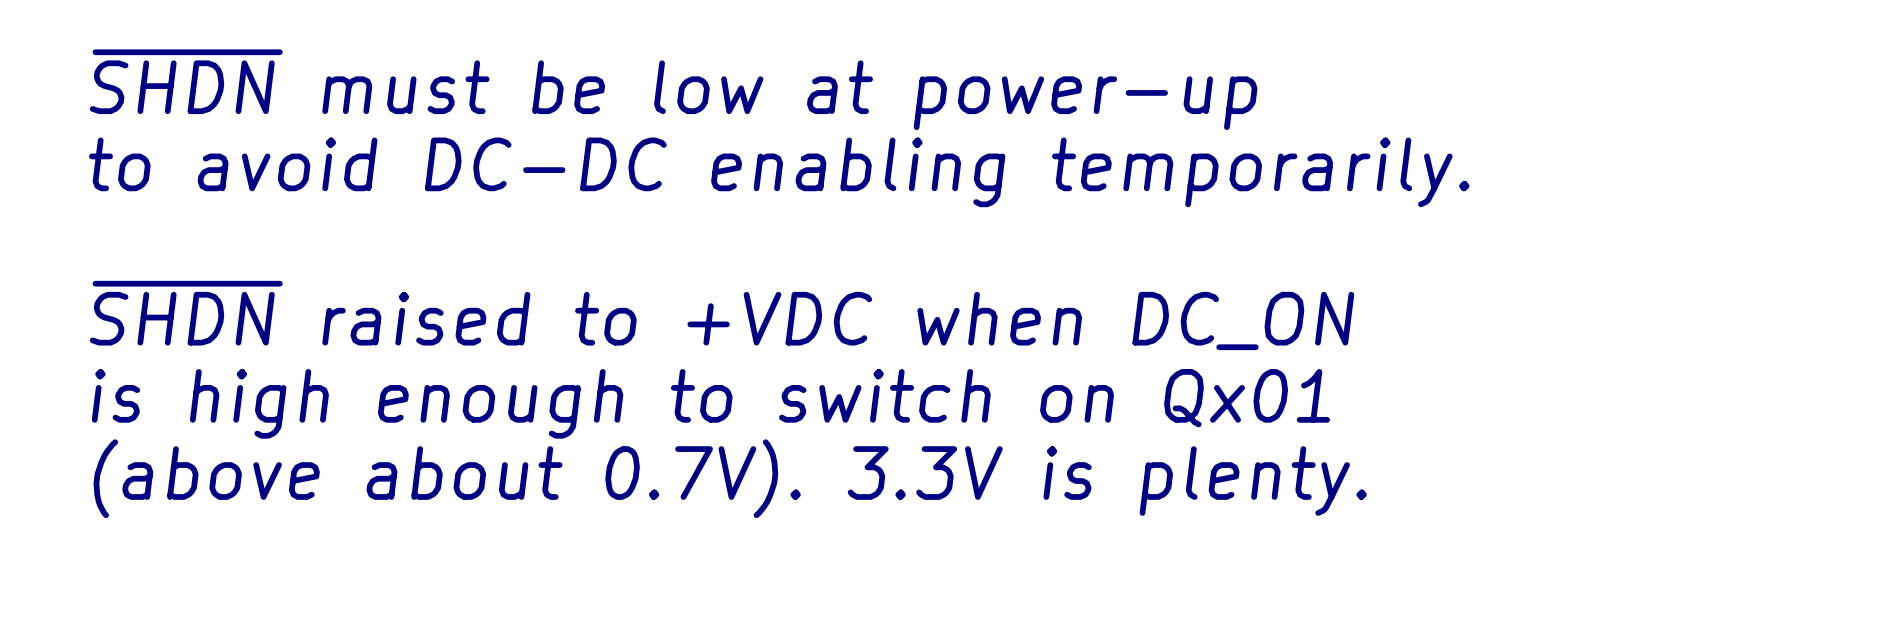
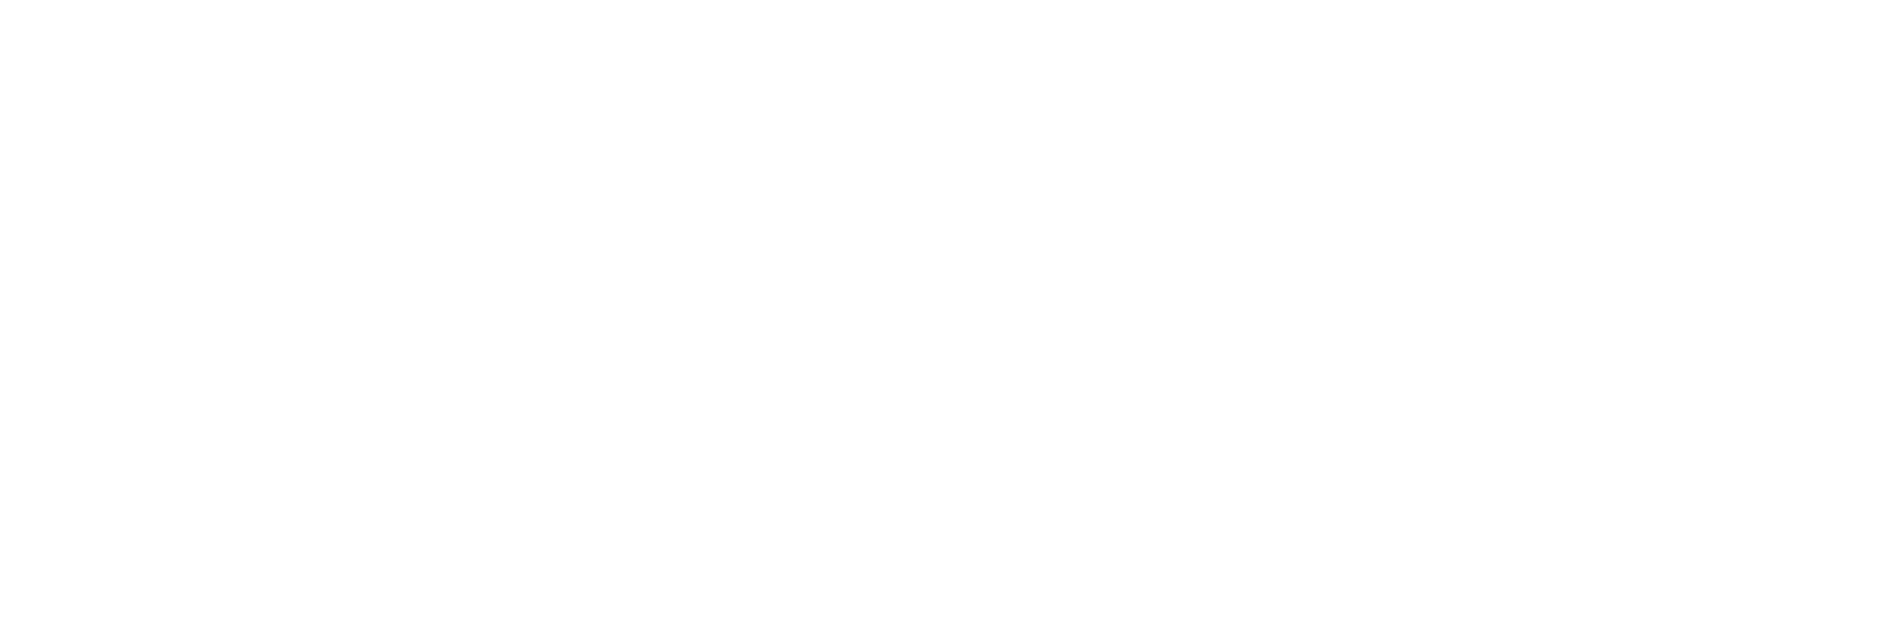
text: ~{SHDN} must be low at power-up (673, 89) -> none
text: to avoid DC-DC enabling temporarily. (779, 172) -> none
text: ~{SHDN} raised to +VDC when DC_ON (722, 315) -> none
text: is high enough to switch on Qx01 (710, 403) -> none
text: (above about 0.7V). 3.3V is plenty. (730, 478) -> none

